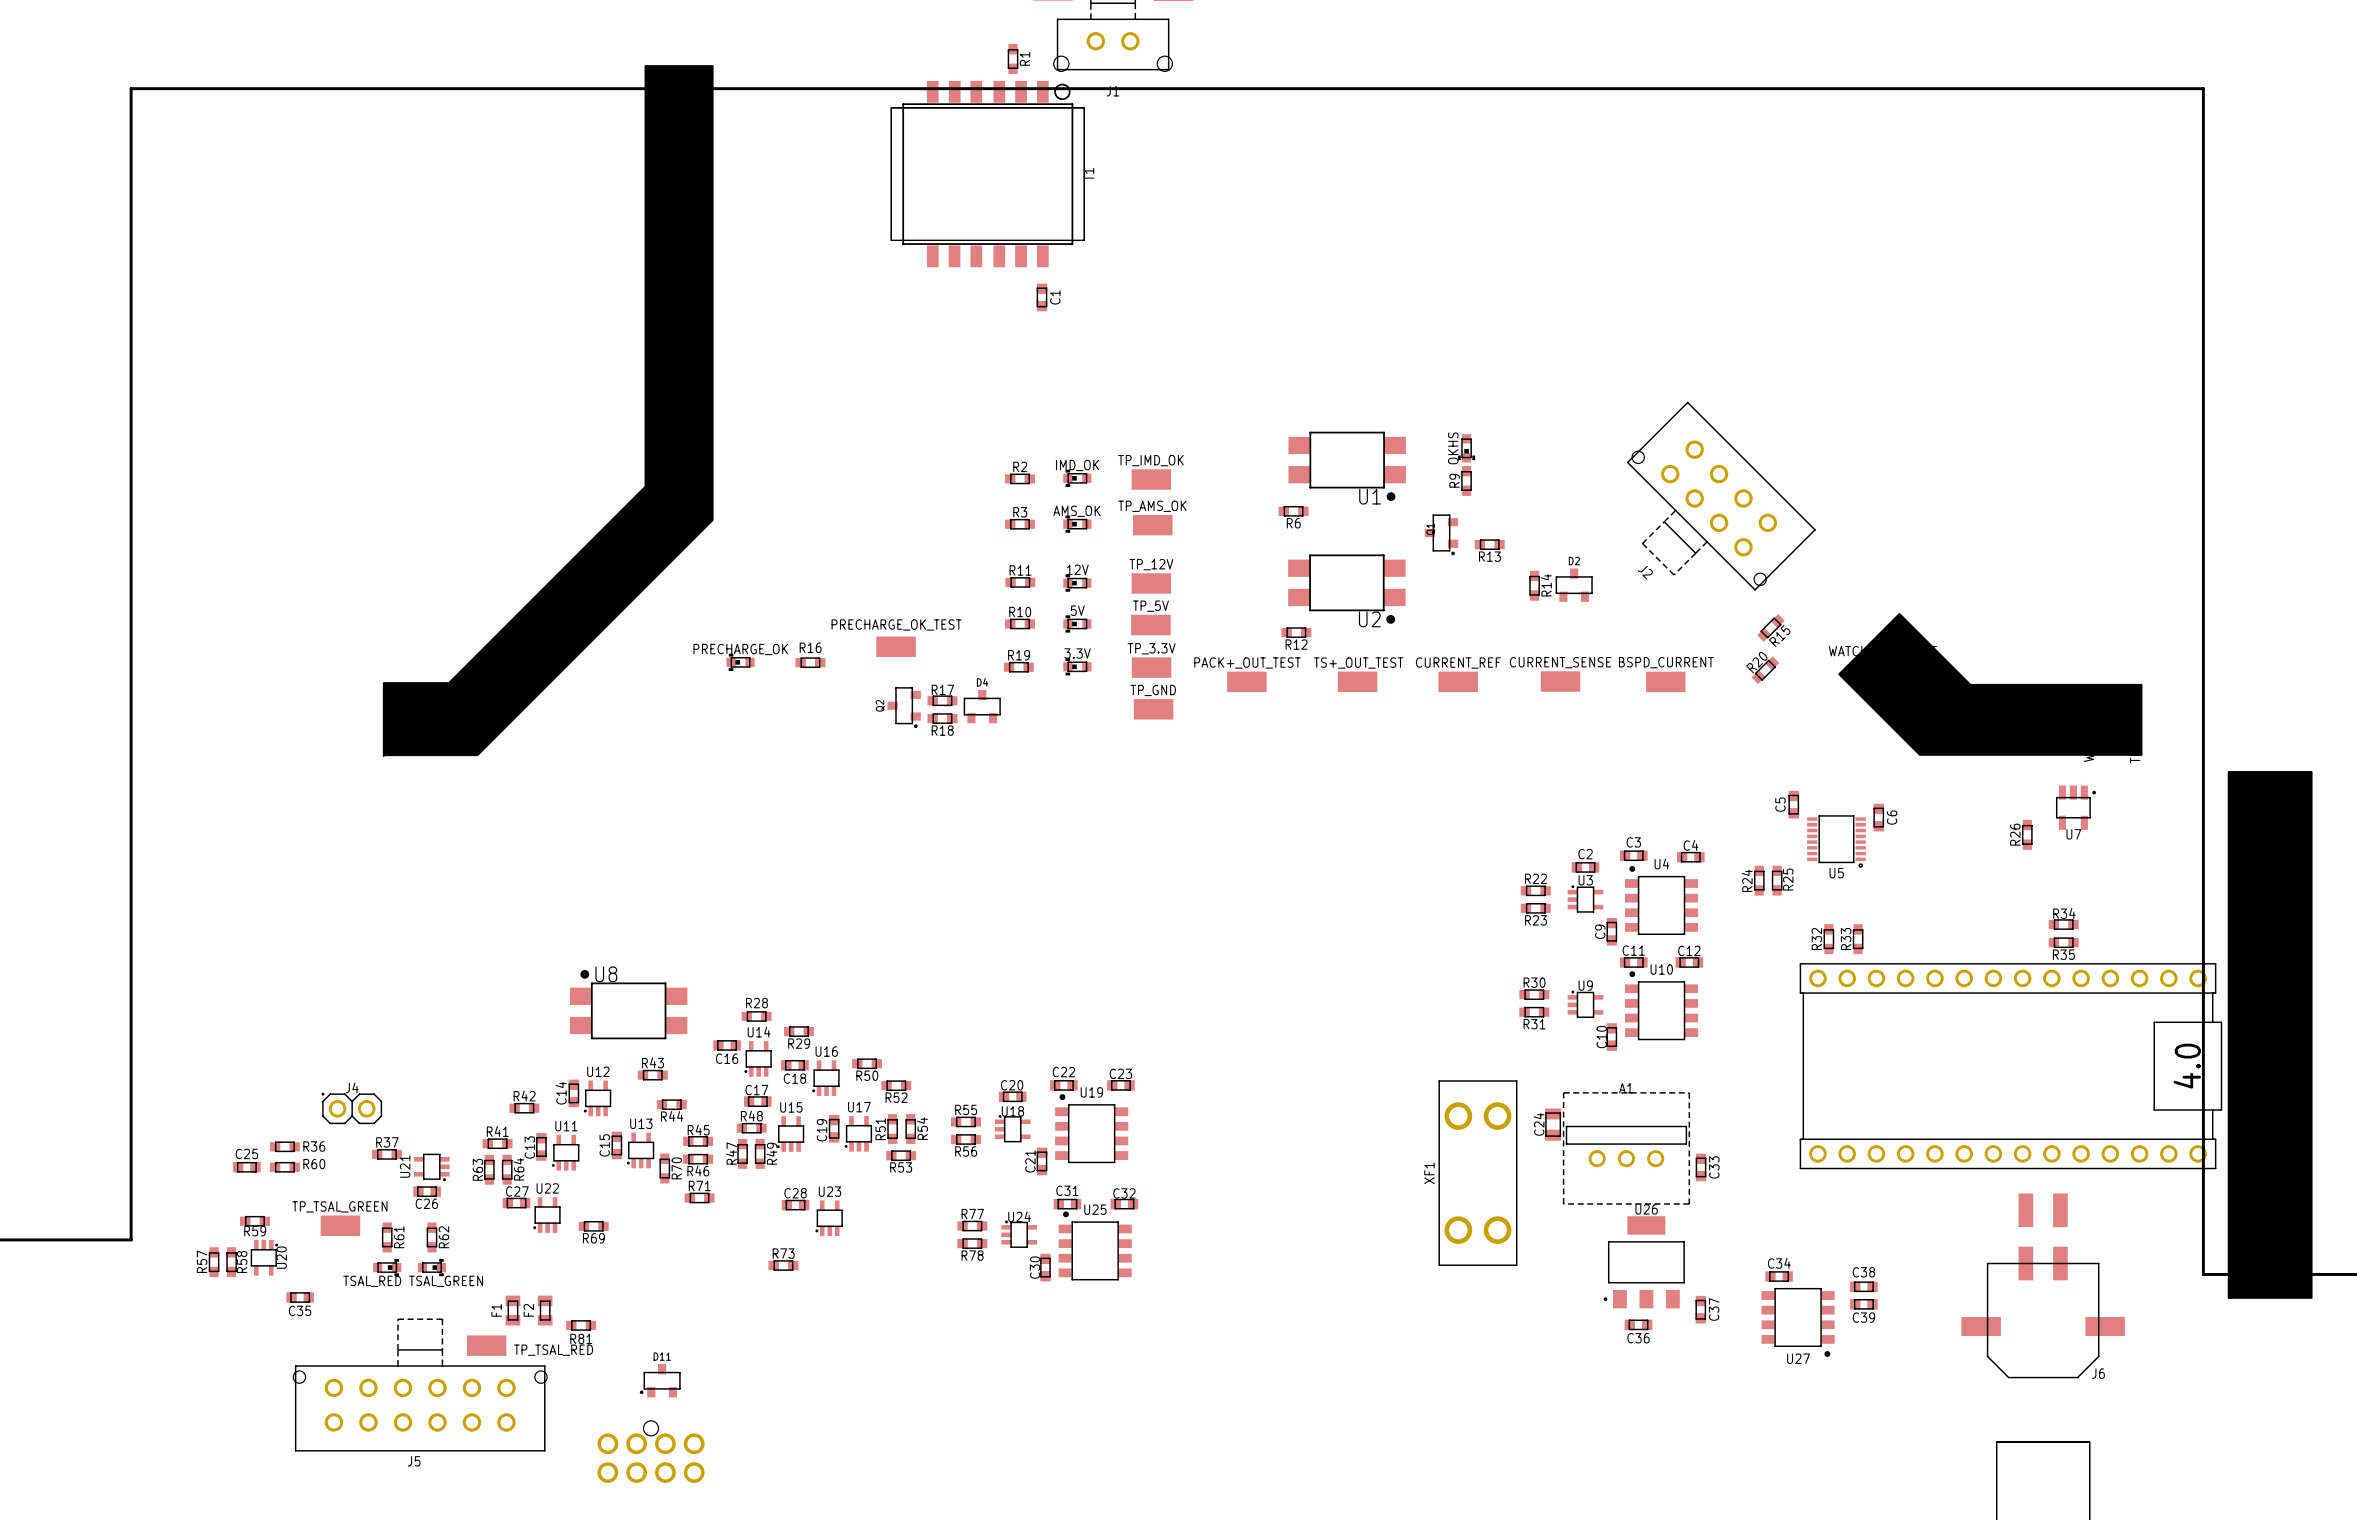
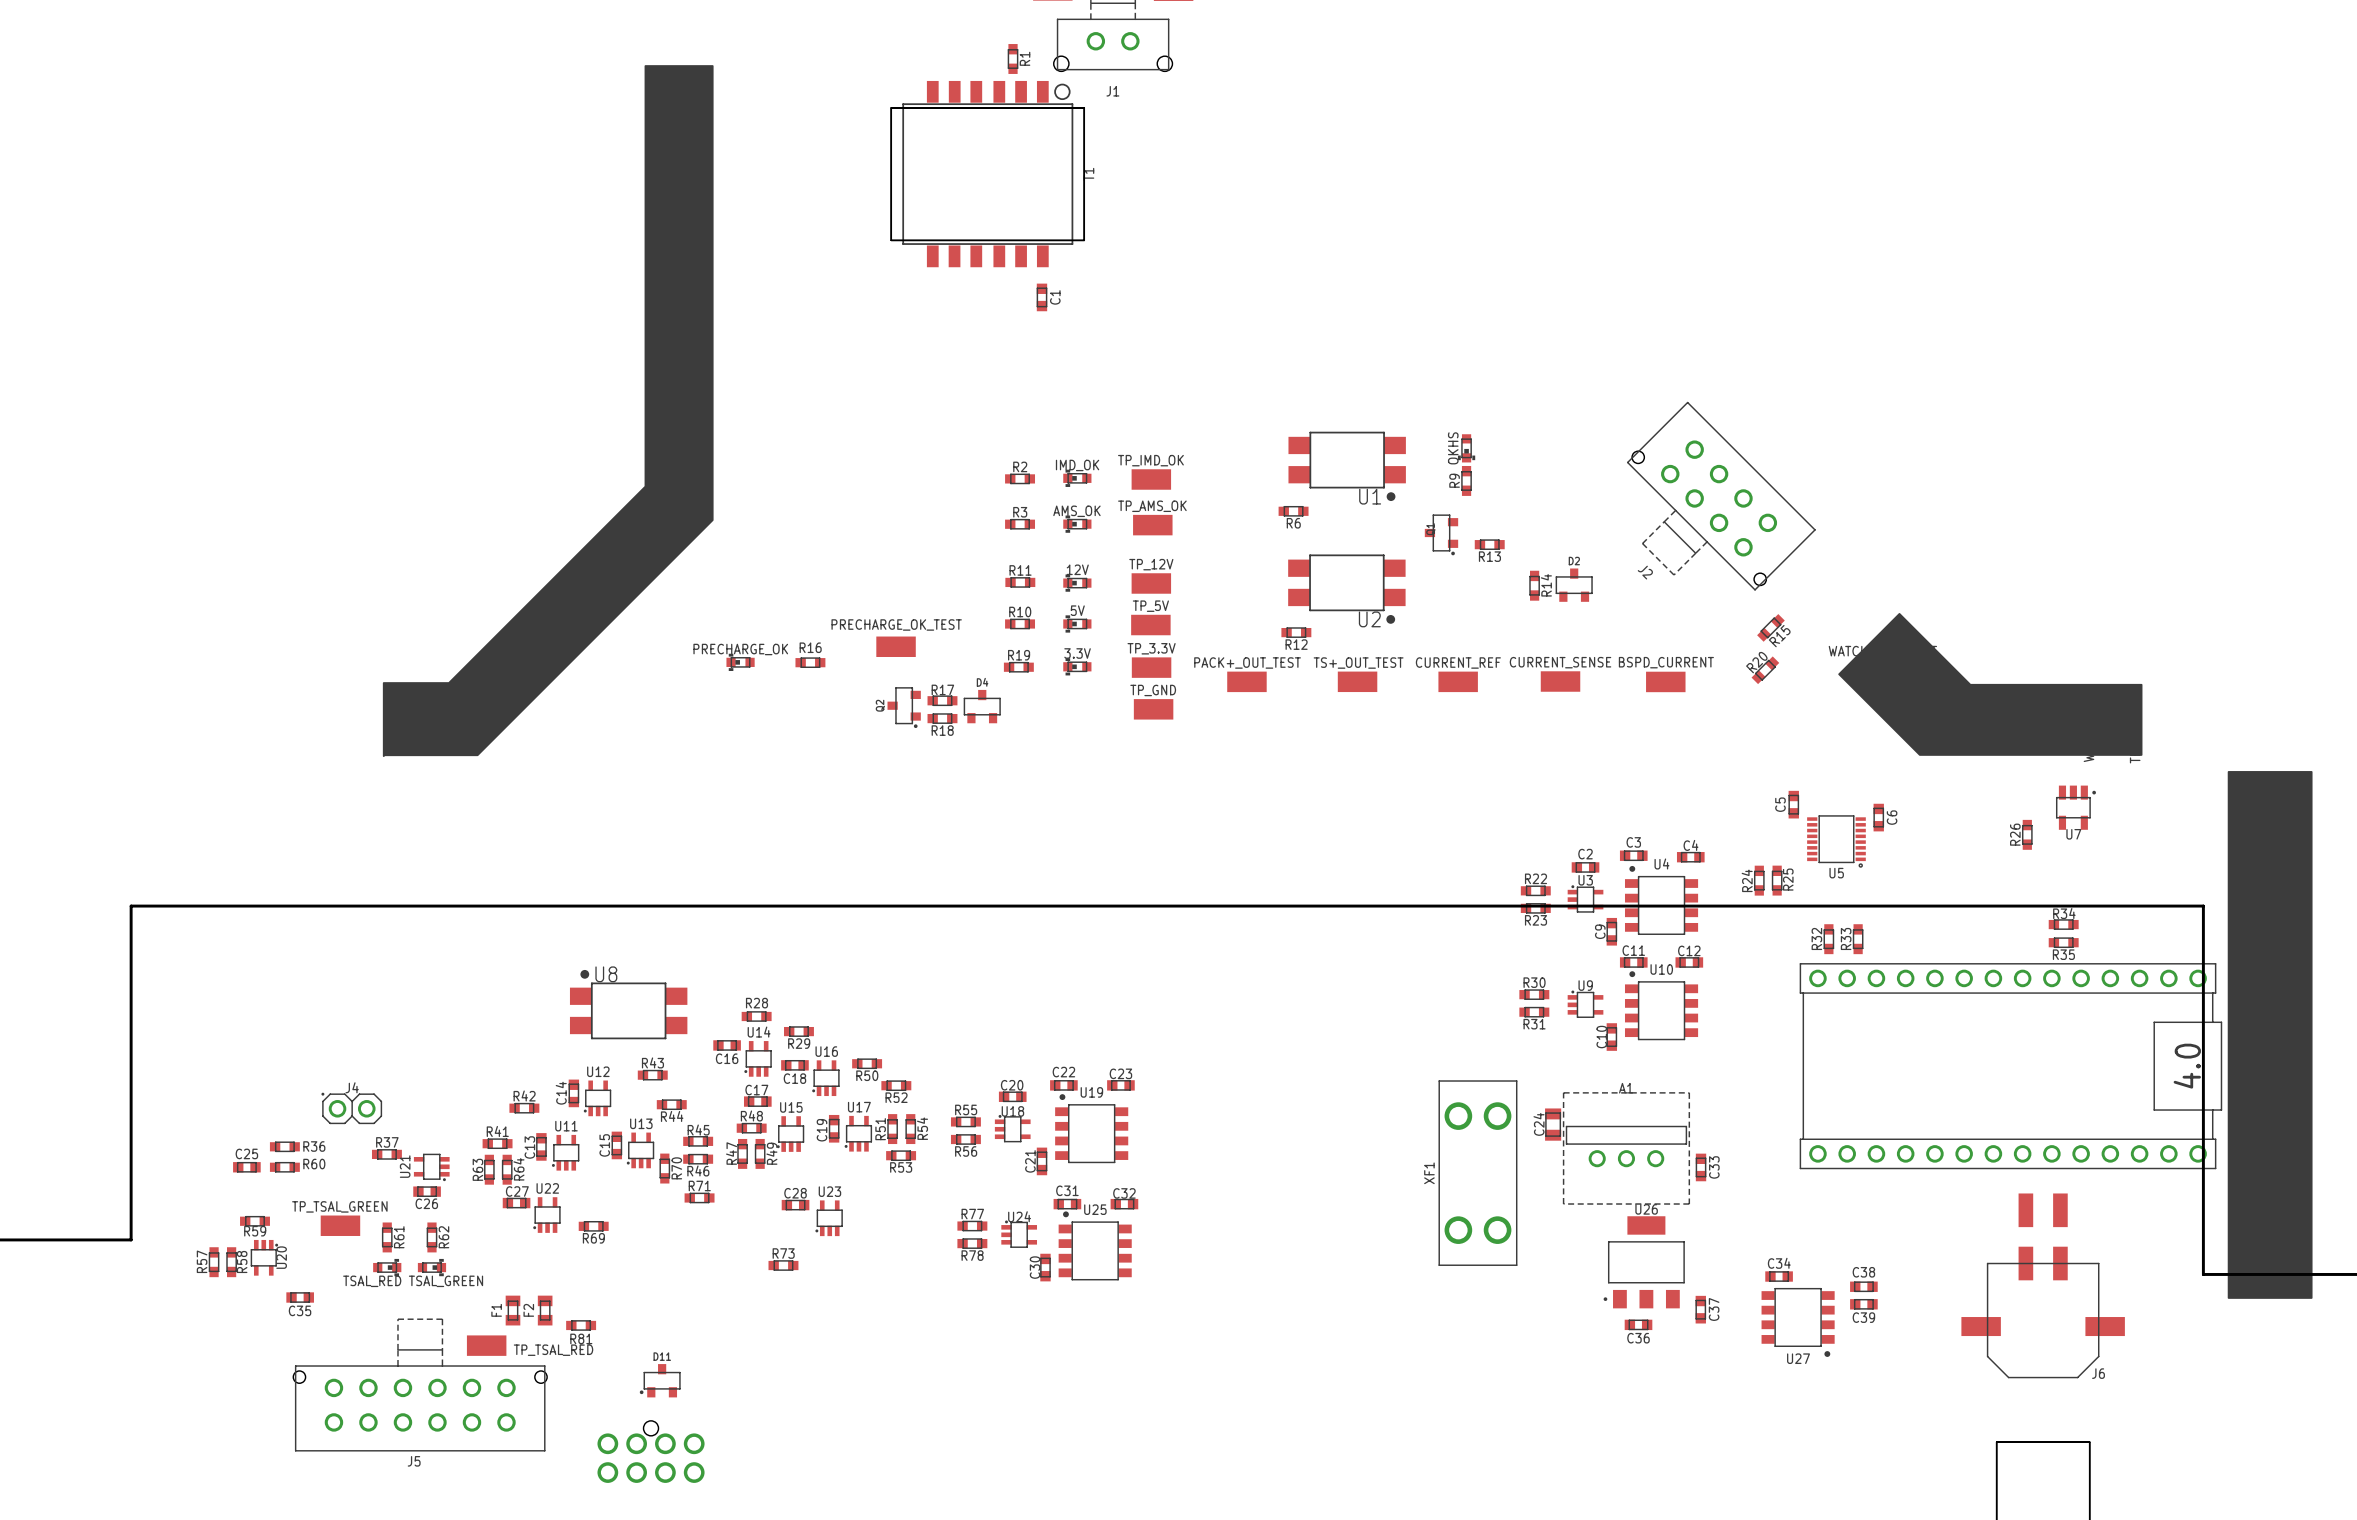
board edge: (131, 906) (131, 88) (2203, 88) (2203, 906) -> (131, 906) (2203, 906)

